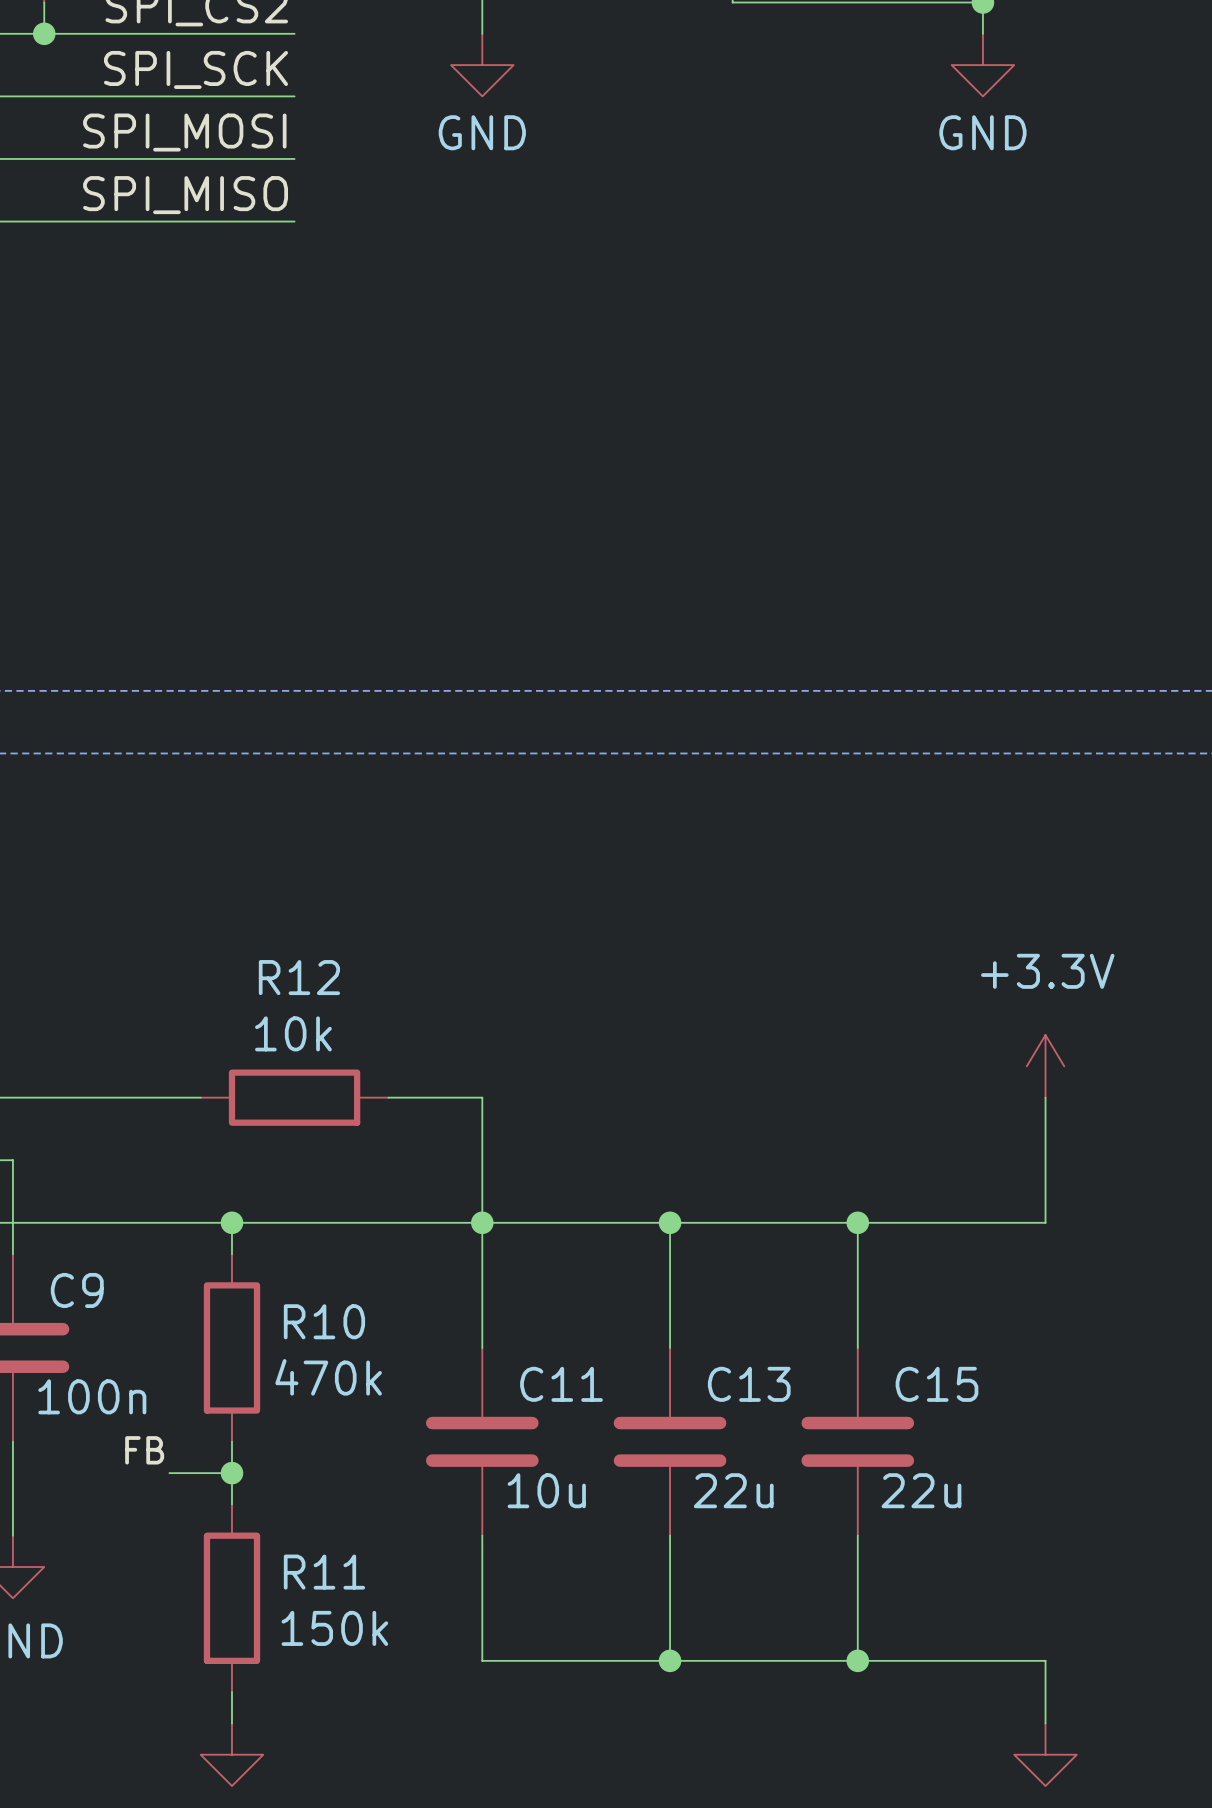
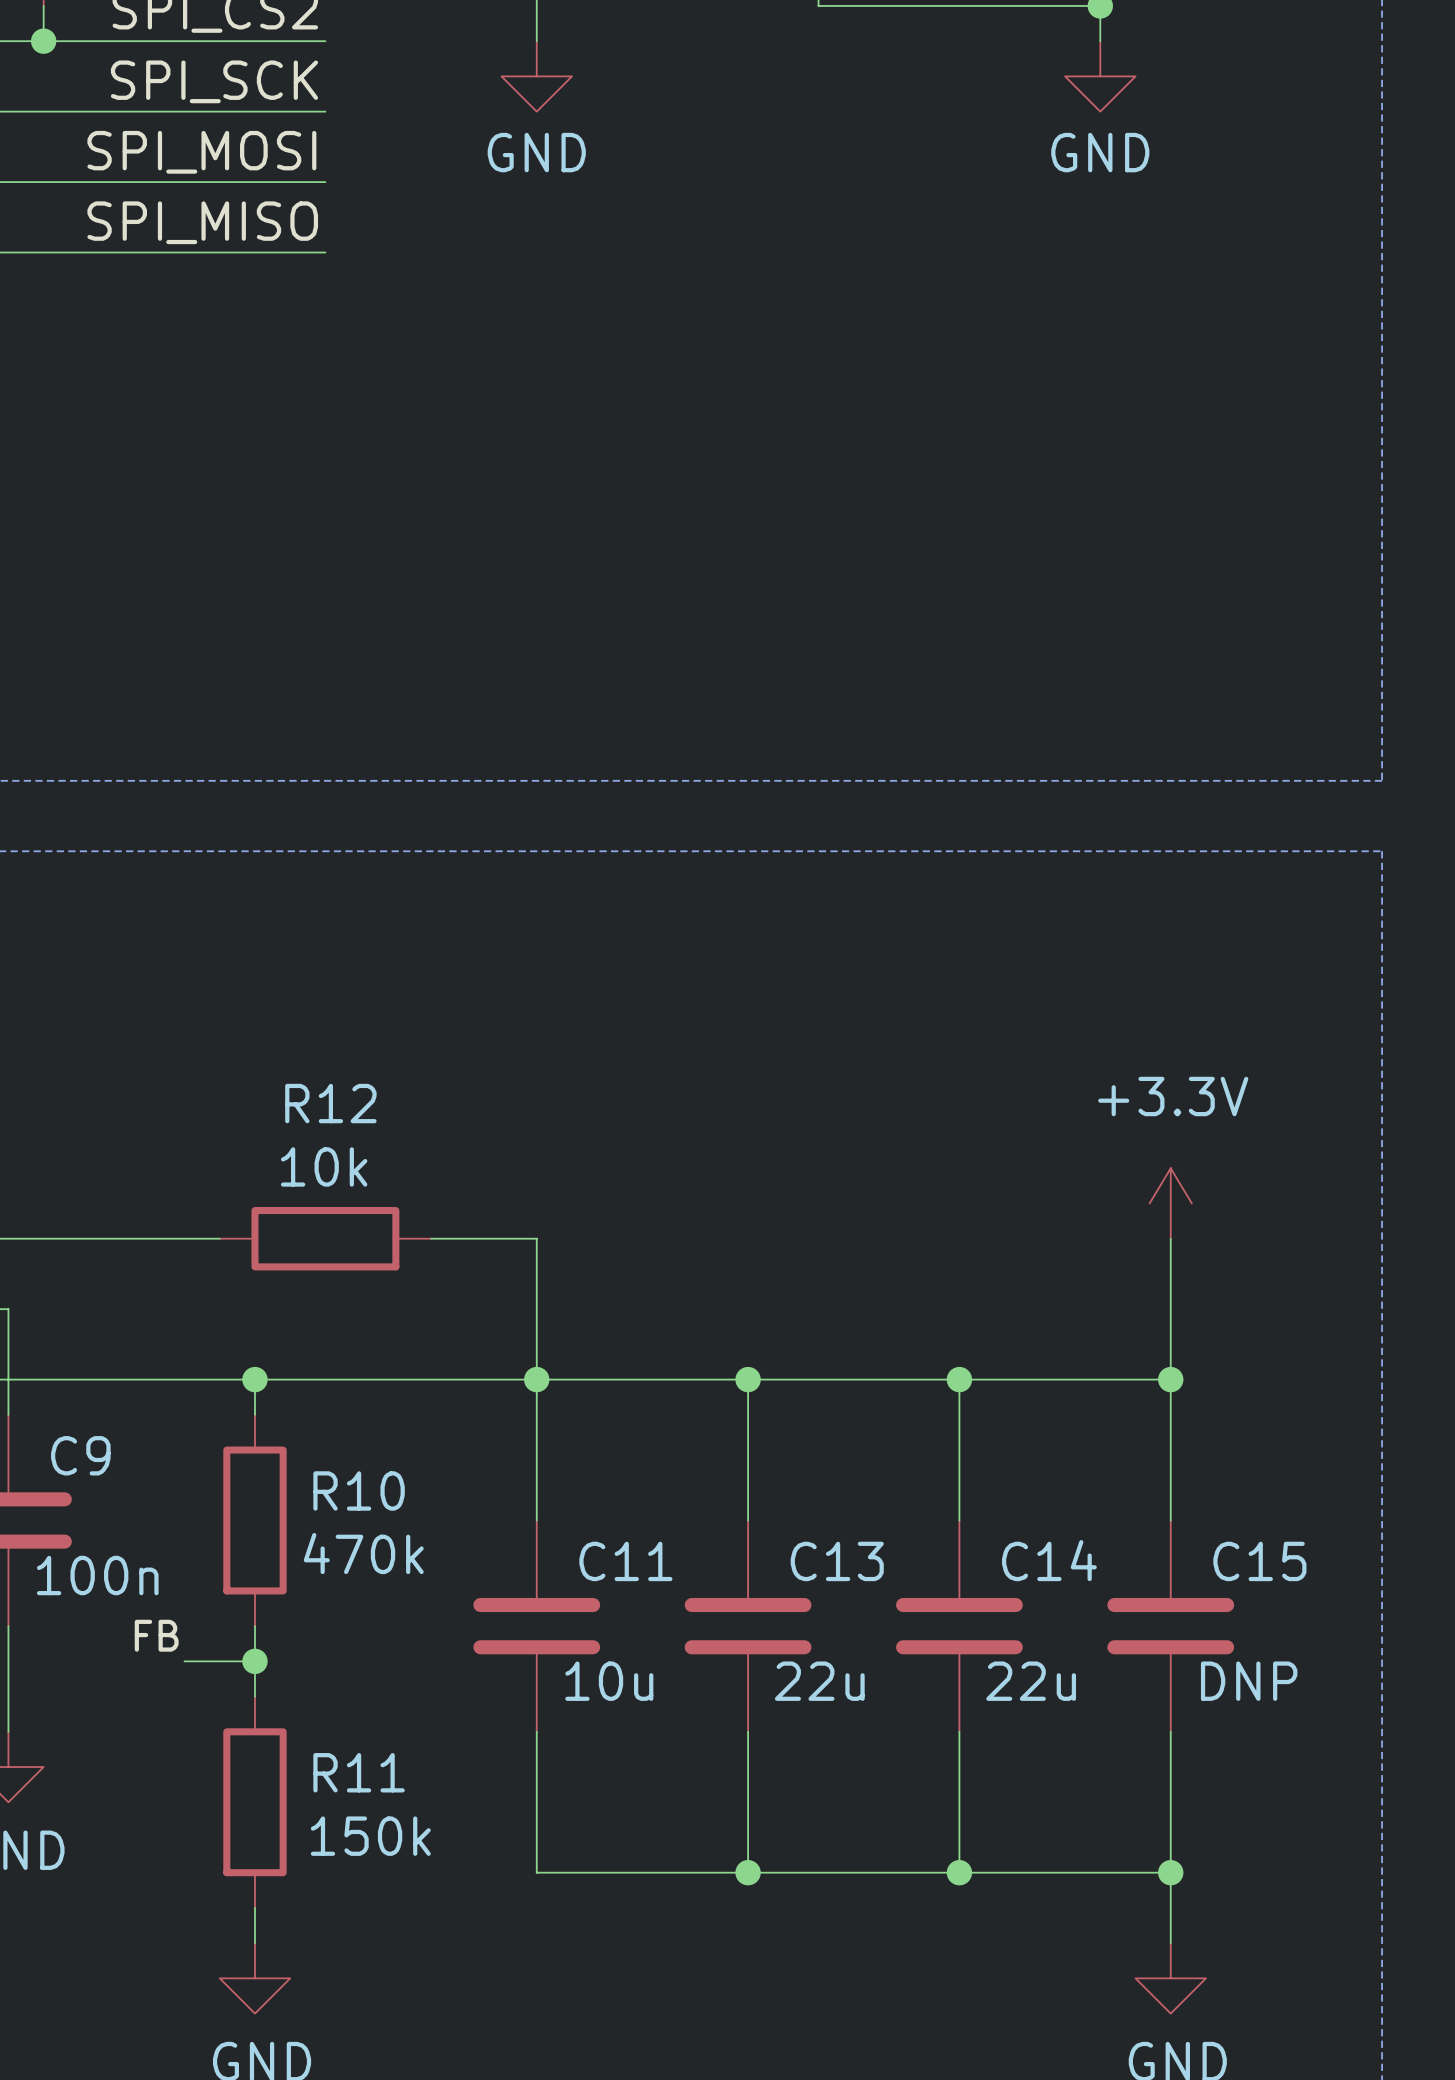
wire: none -> (1170, 1379) (1170, 1520)
junction: none -> (1170, 1379)
C15 name: C15 (936, 1384) -> C14 (1049, 1560)
C15: none -> DNP (1170, 1626)
wire: none -> (1170, 1731) (1170, 1872)
junction: none -> (1170, 1872)

